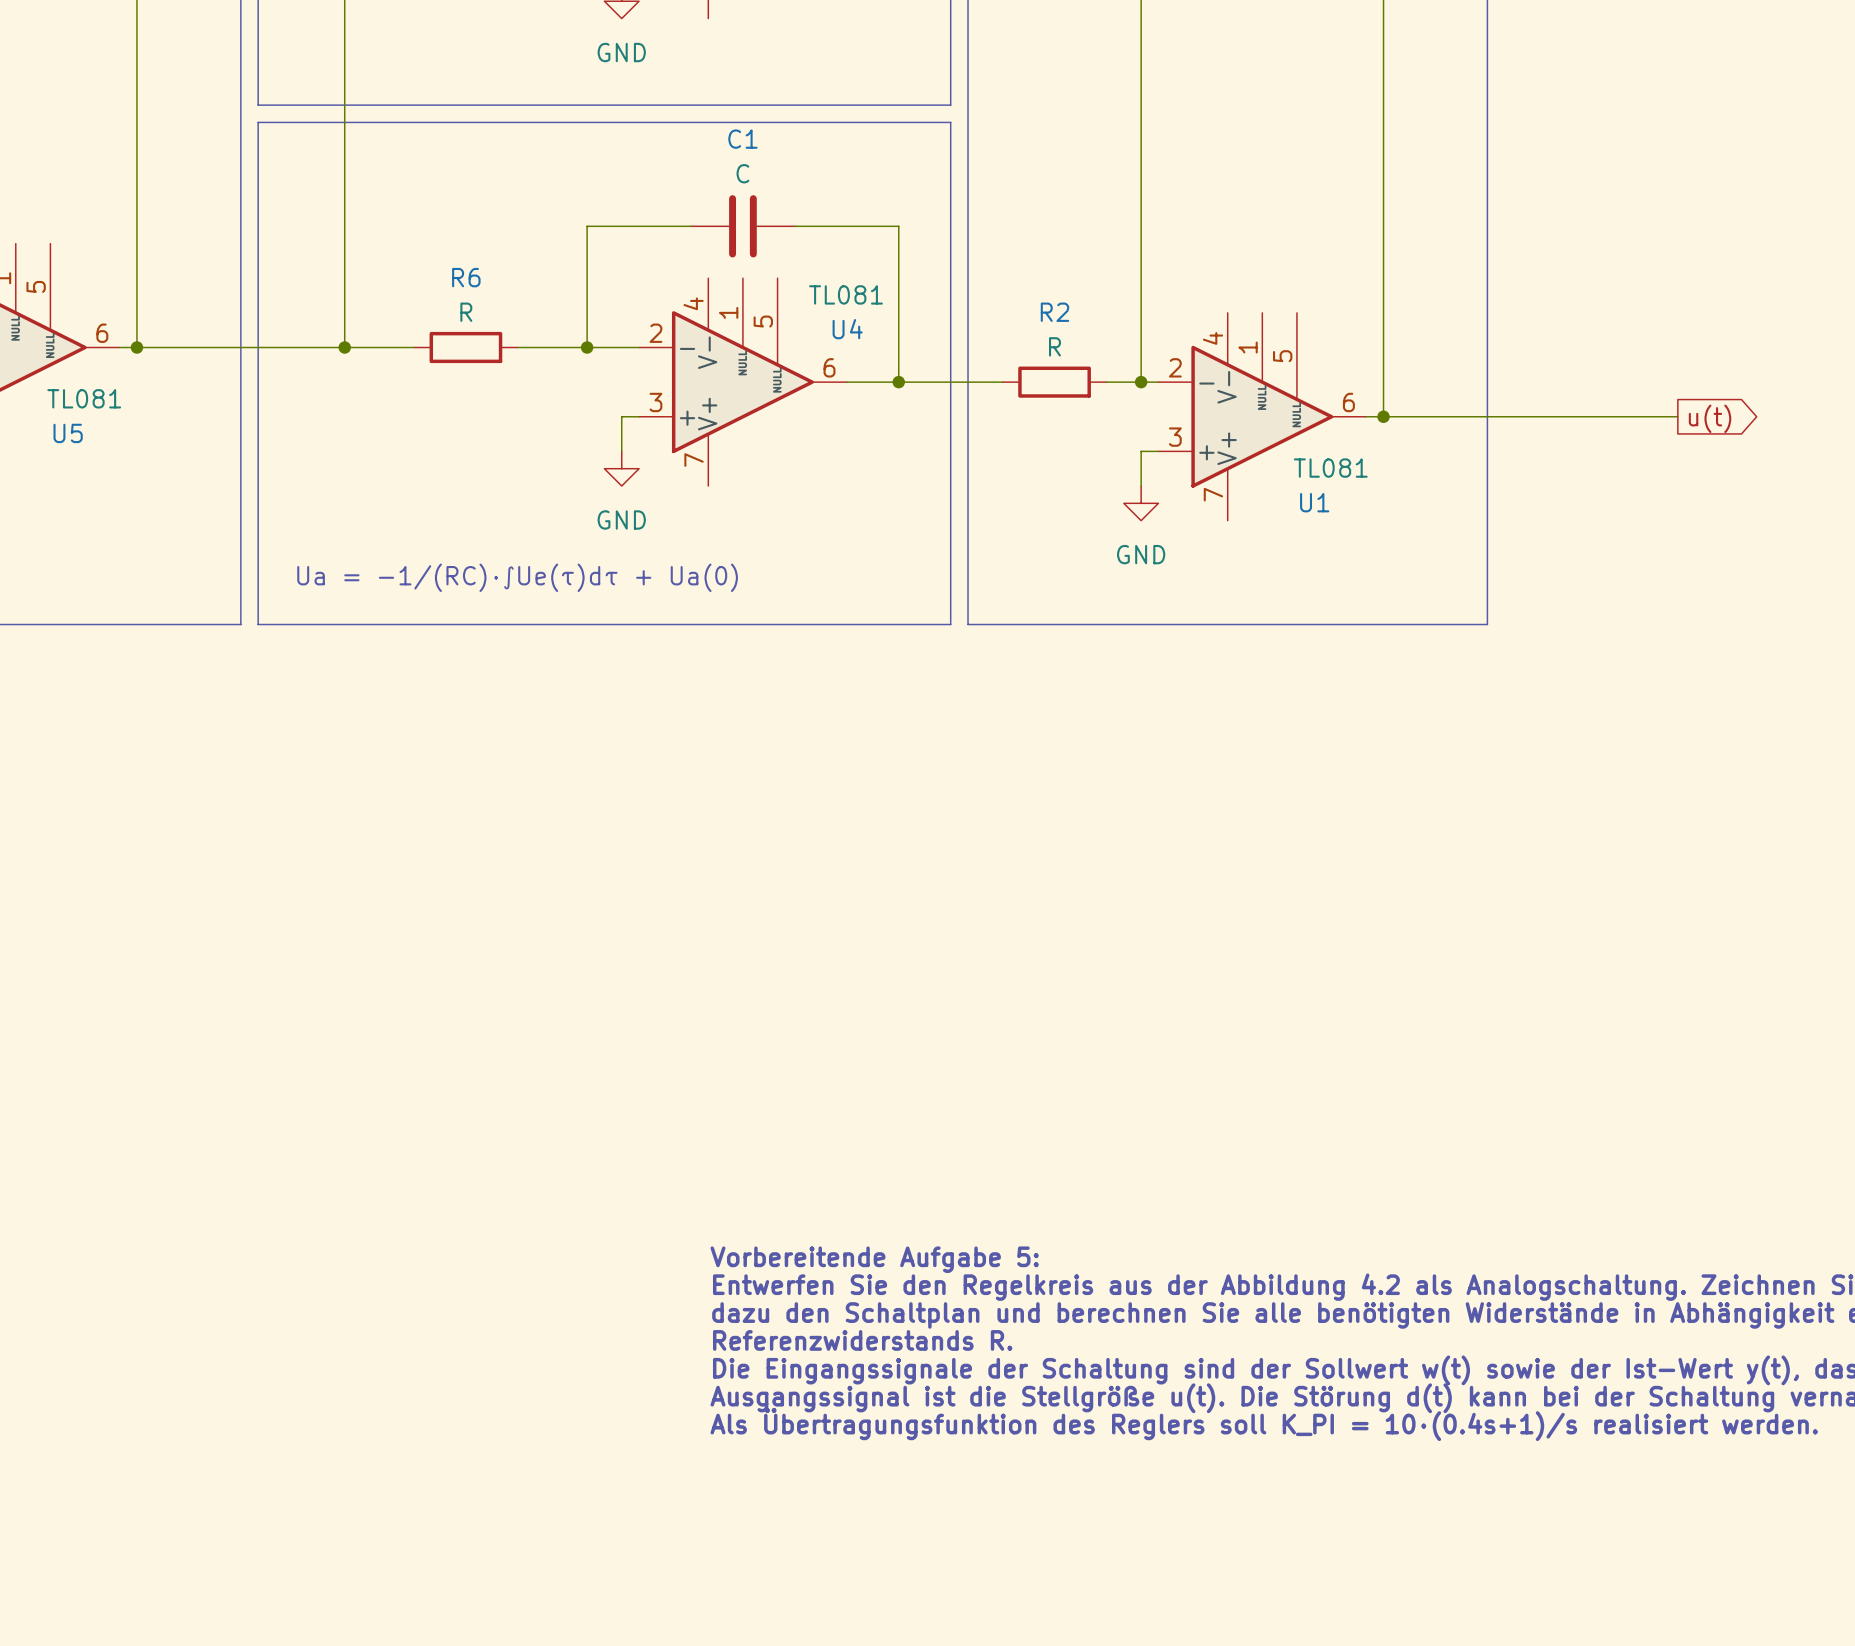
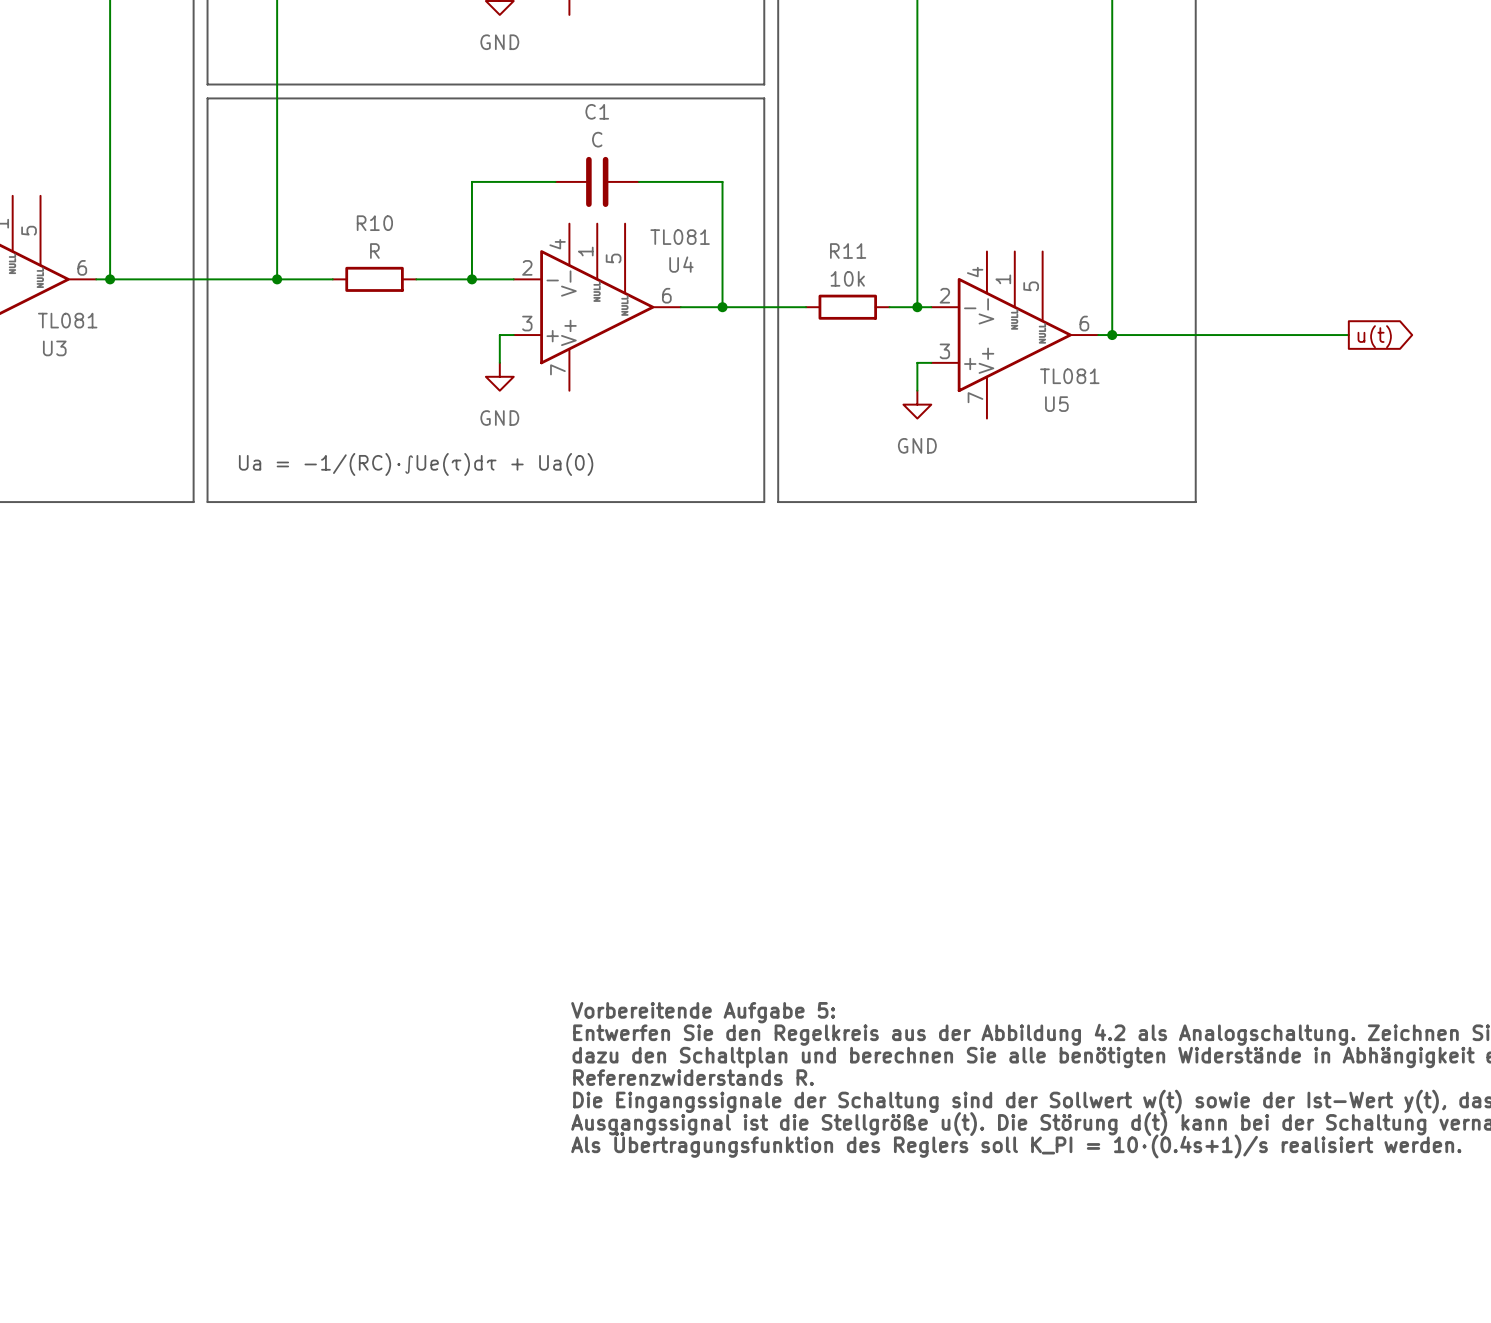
R6 name: R6 (466, 277) -> R10 (374, 223)
R2 name: R2 (1054, 312) -> R11 (848, 251)
R2 value: R (1054, 346) -> 10k (847, 278)
U5 name: U5 (68, 433) -> U3 (54, 348)
U1 name: U1 (1314, 502) -> U5 (1056, 404)

